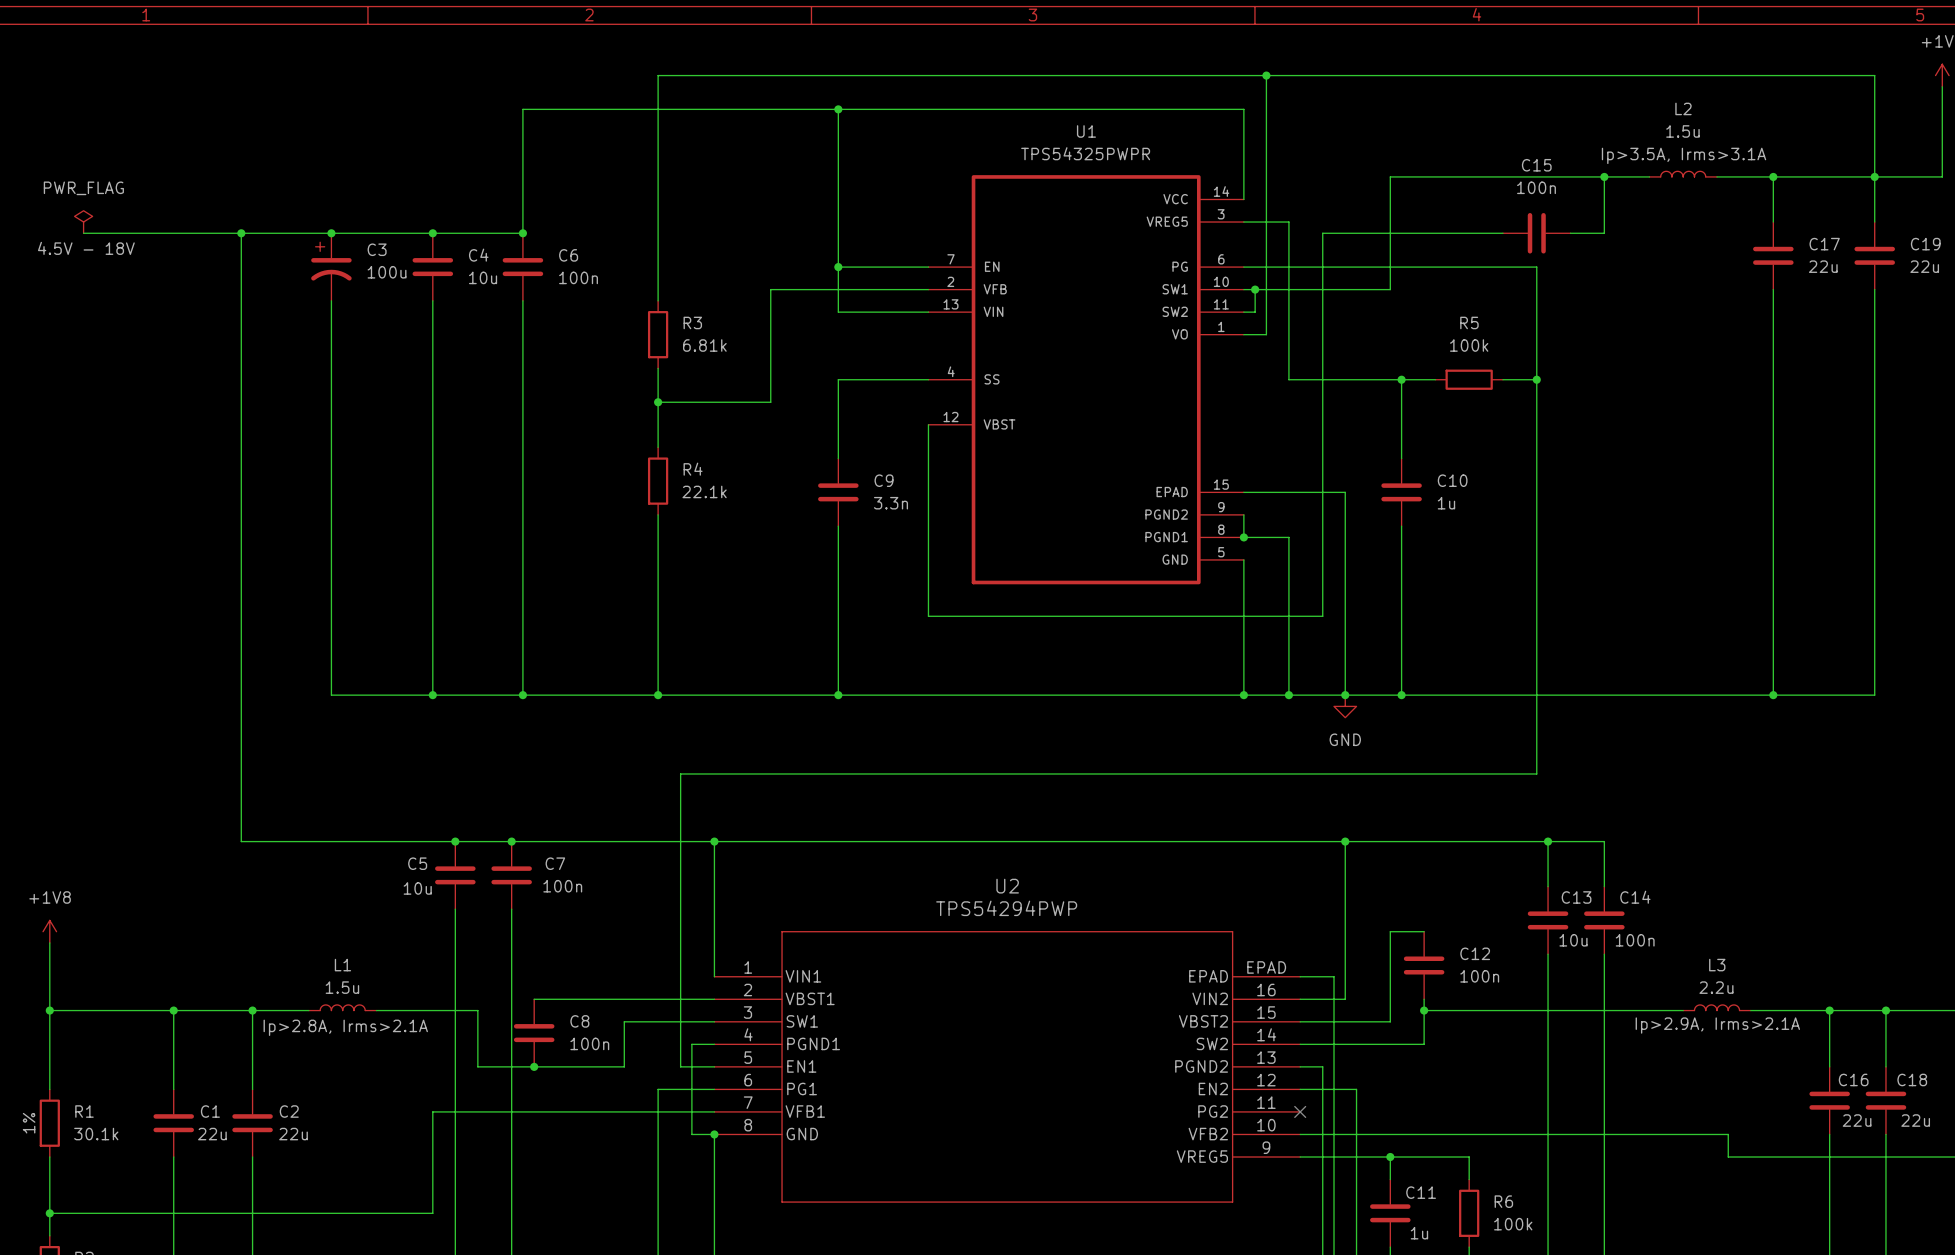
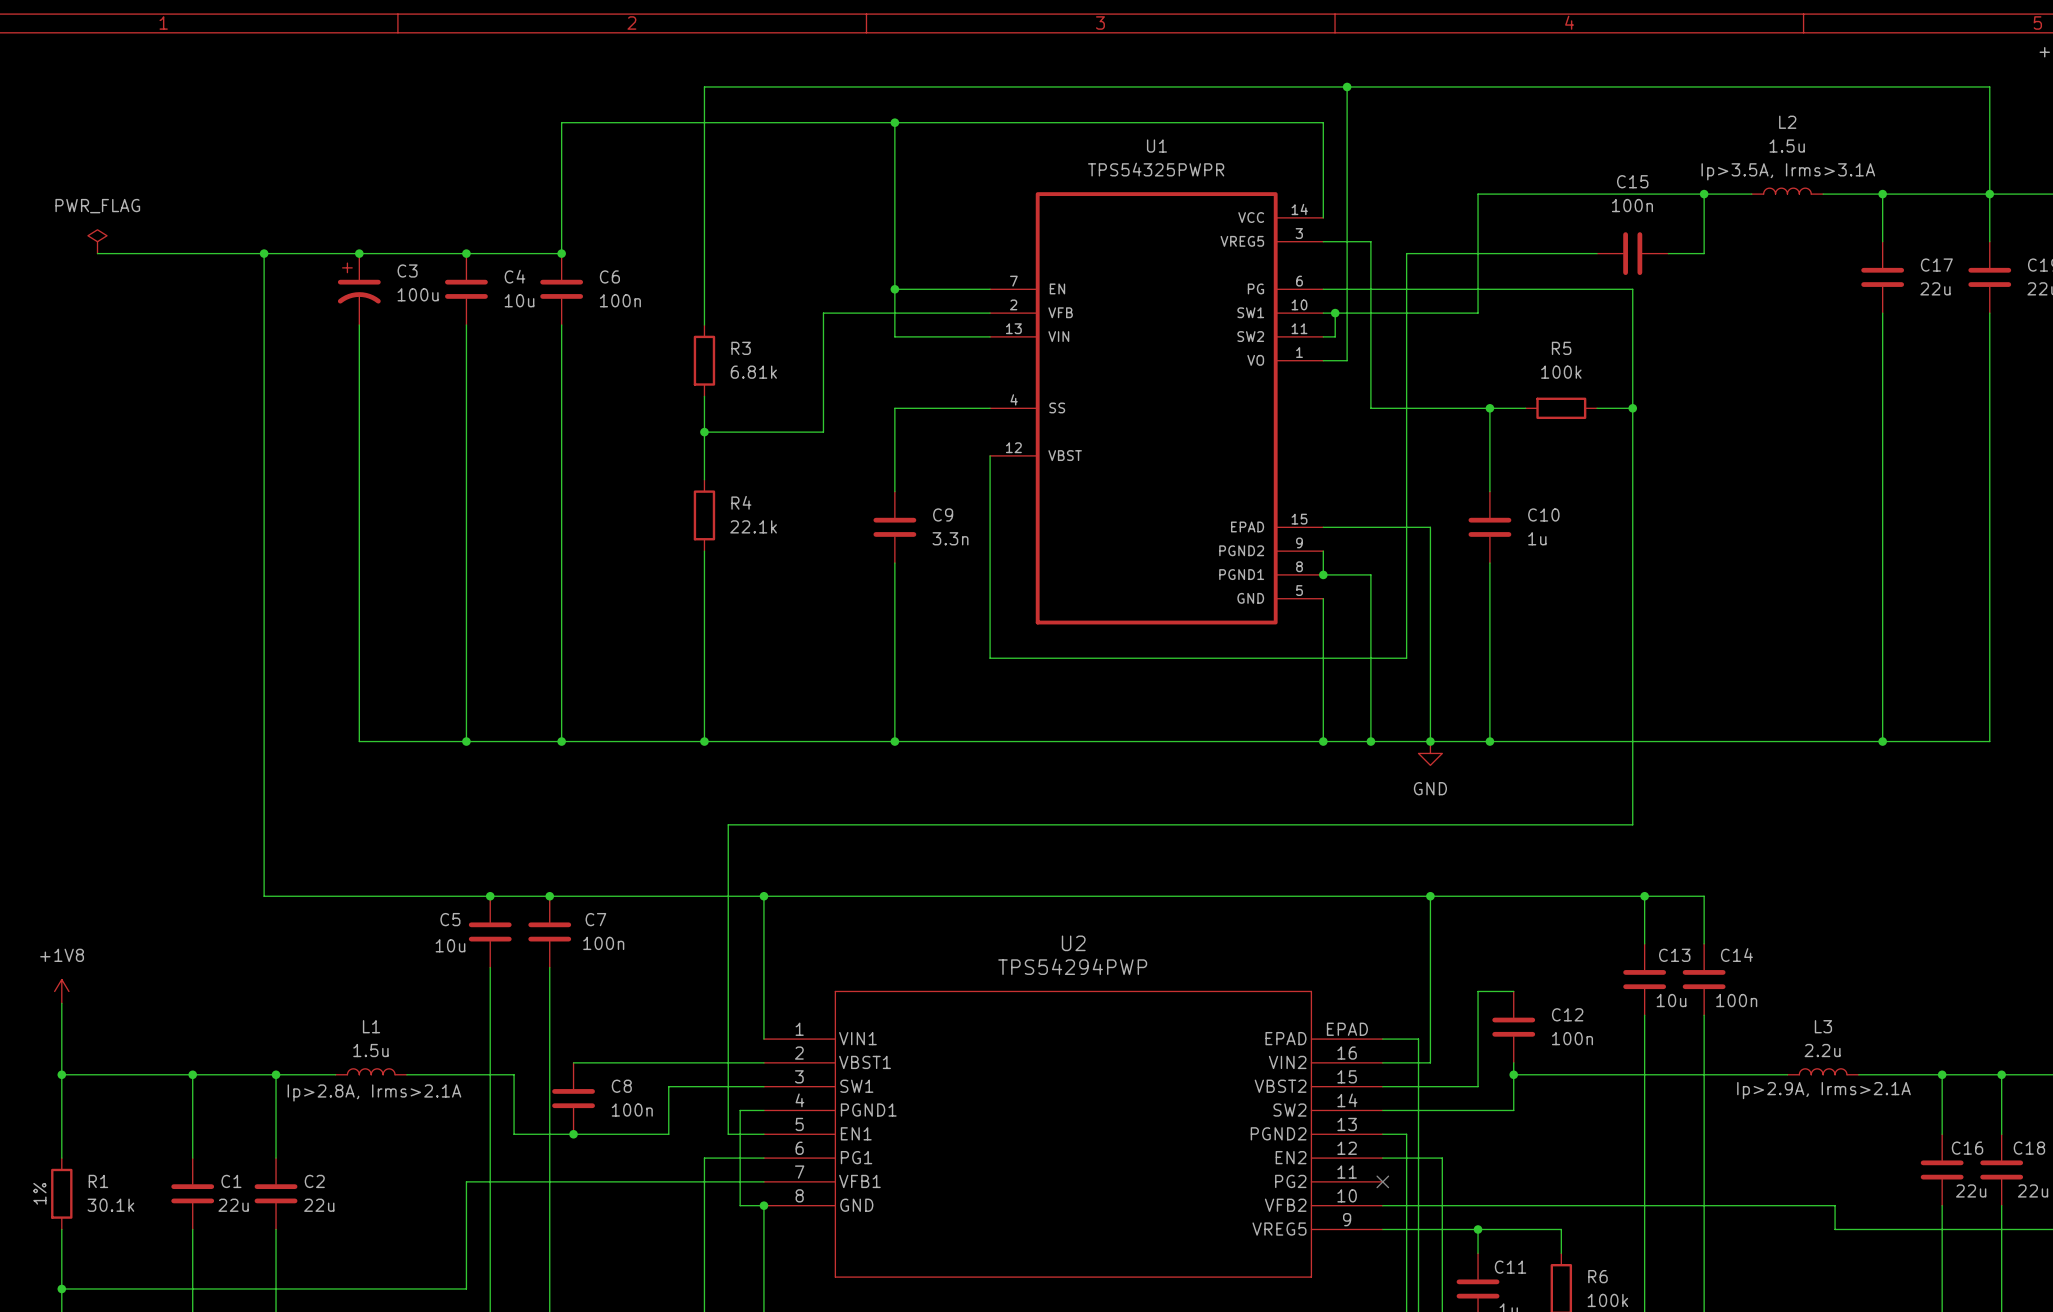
power symbol text: 4.5V - 18V (86, 248) -> none

